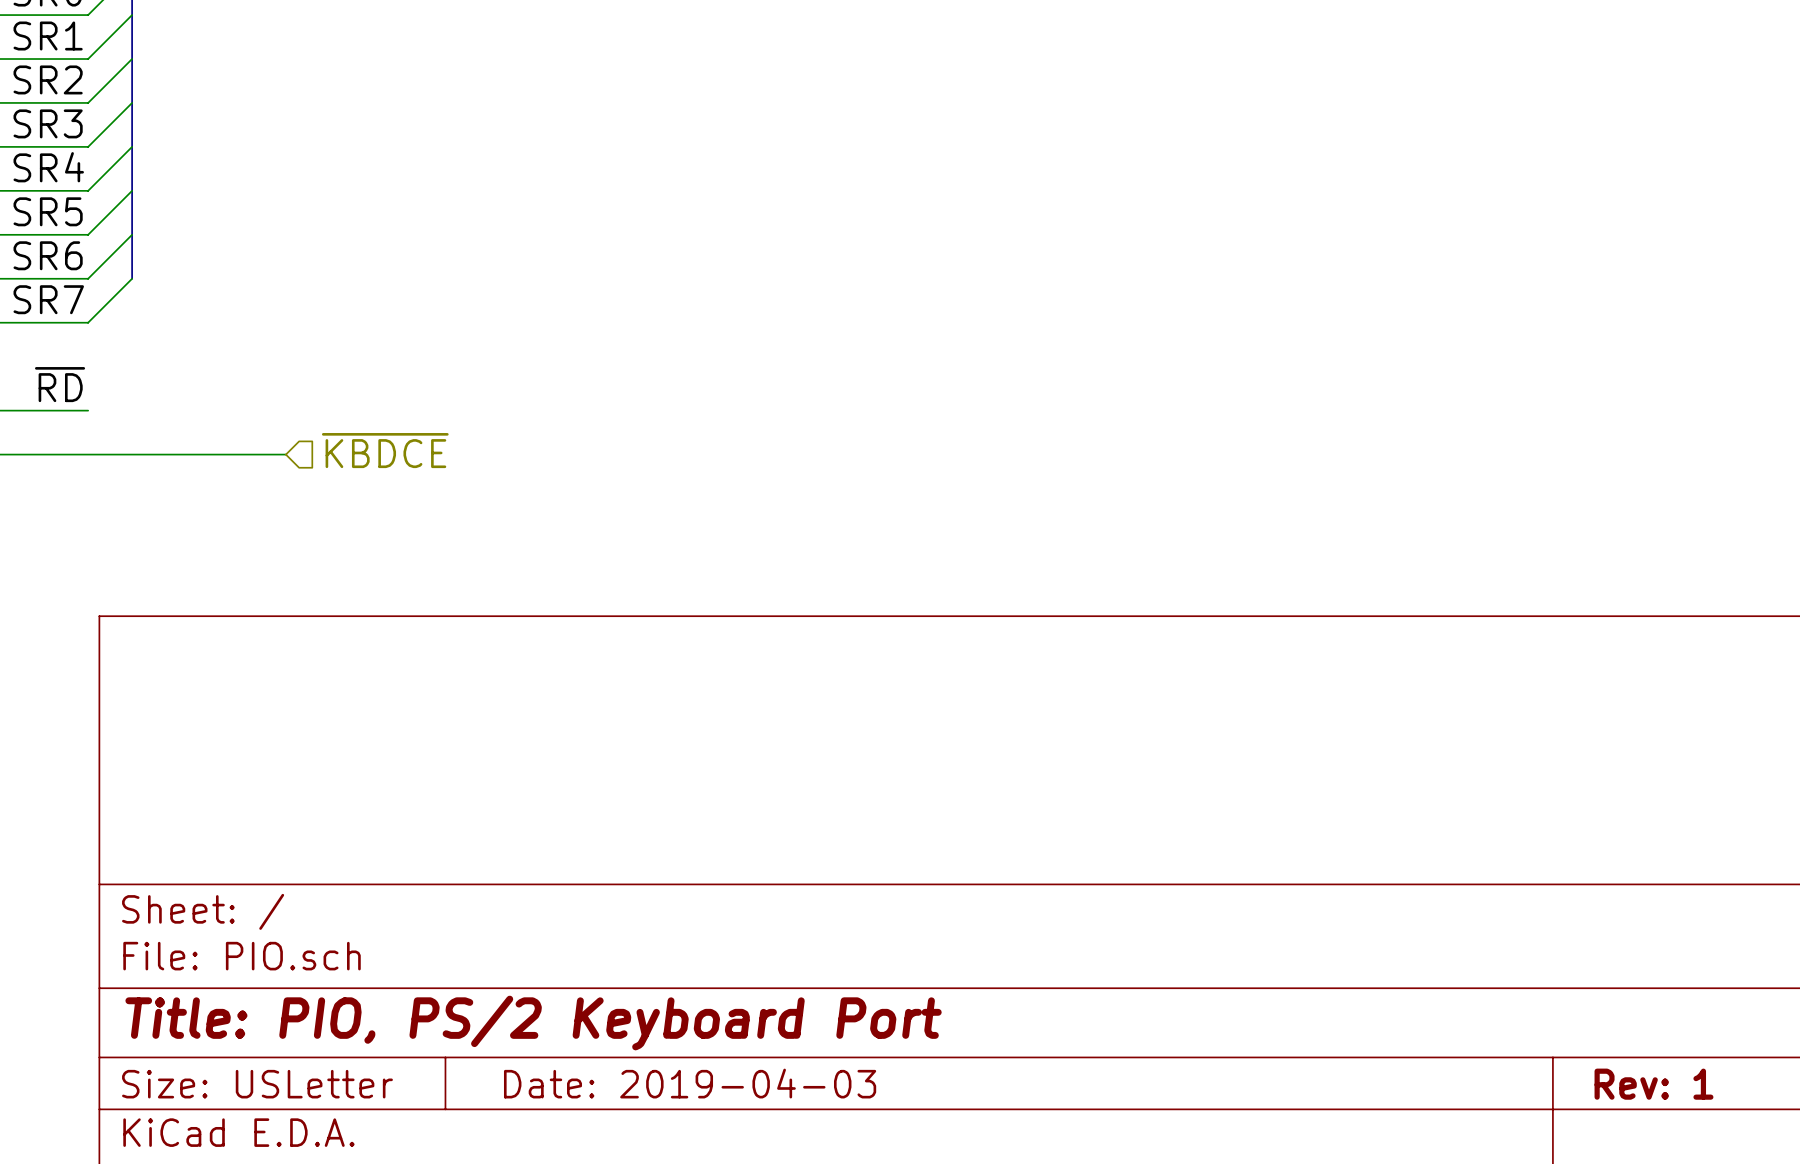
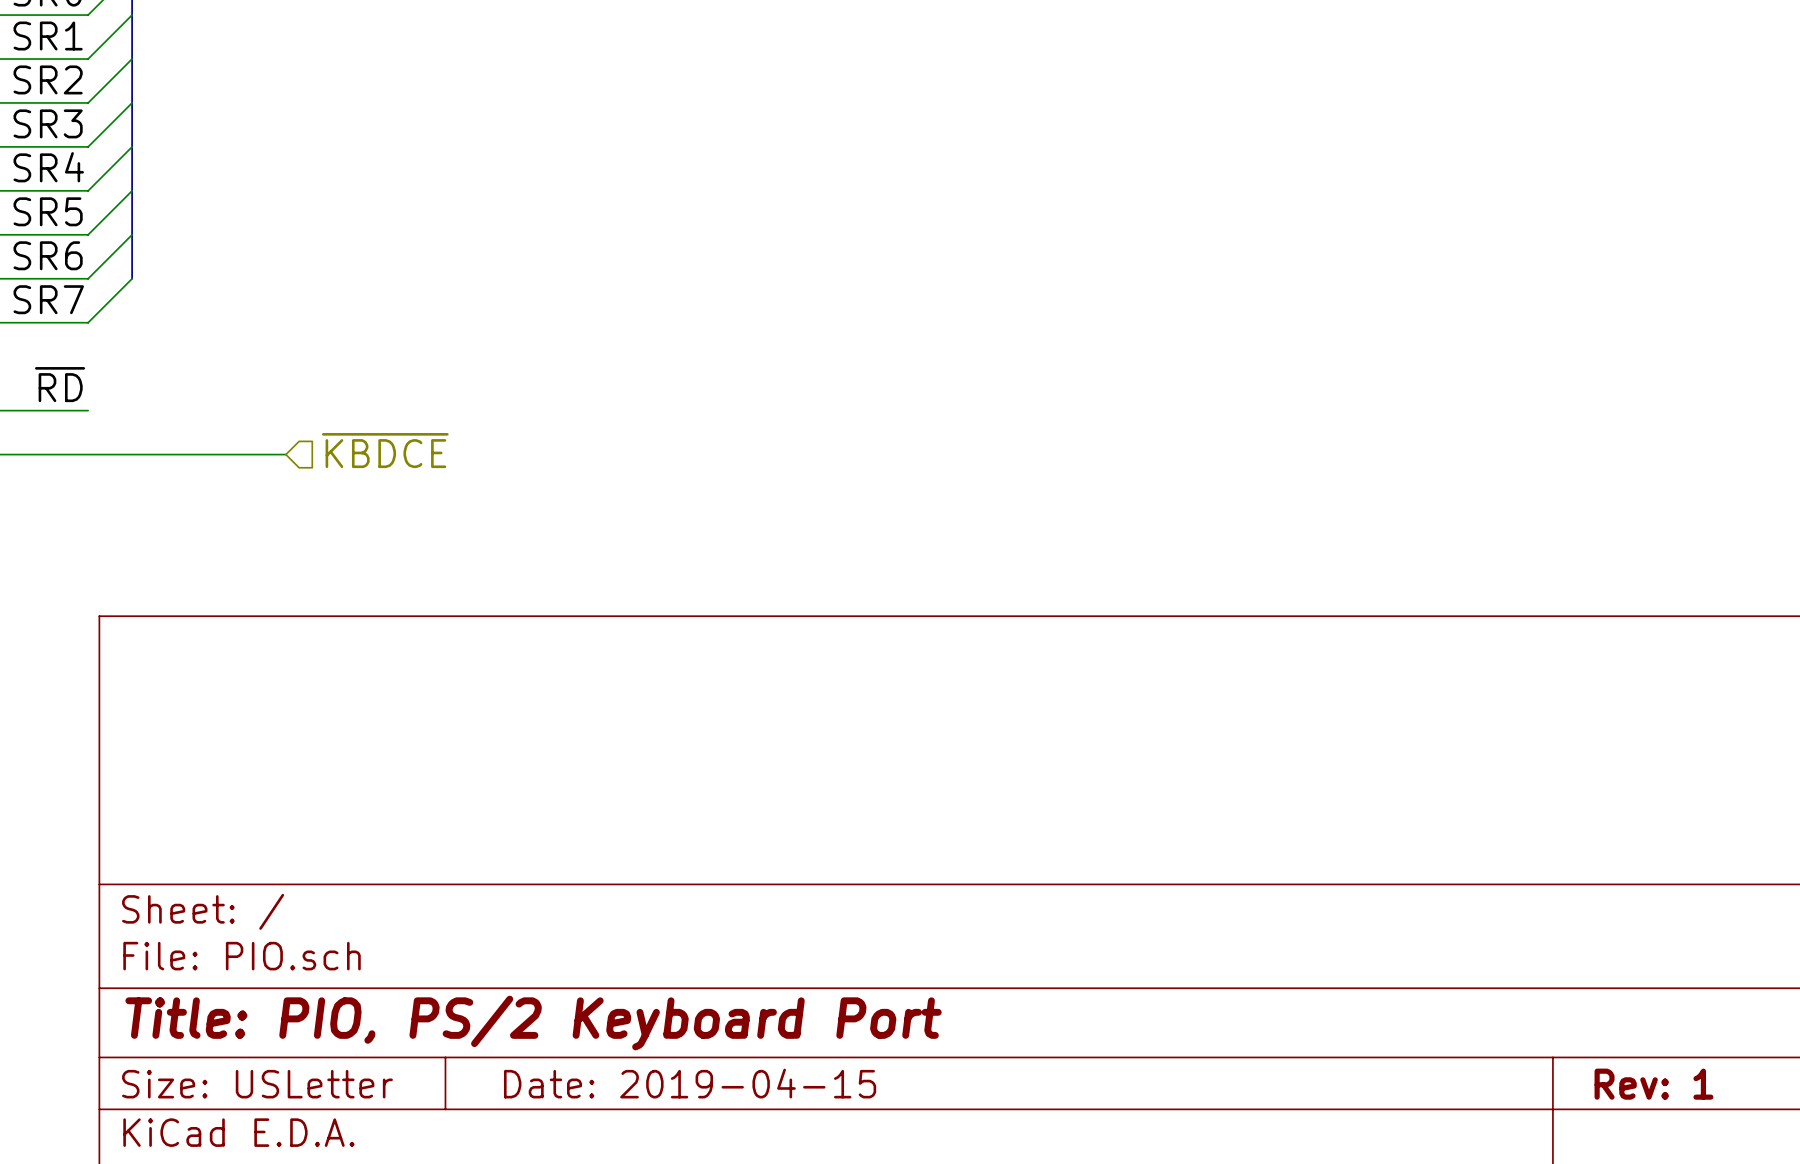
title block: Date: 2019-04-03 (690, 1083) -> Date: 2019-04-15 (690, 1083)

